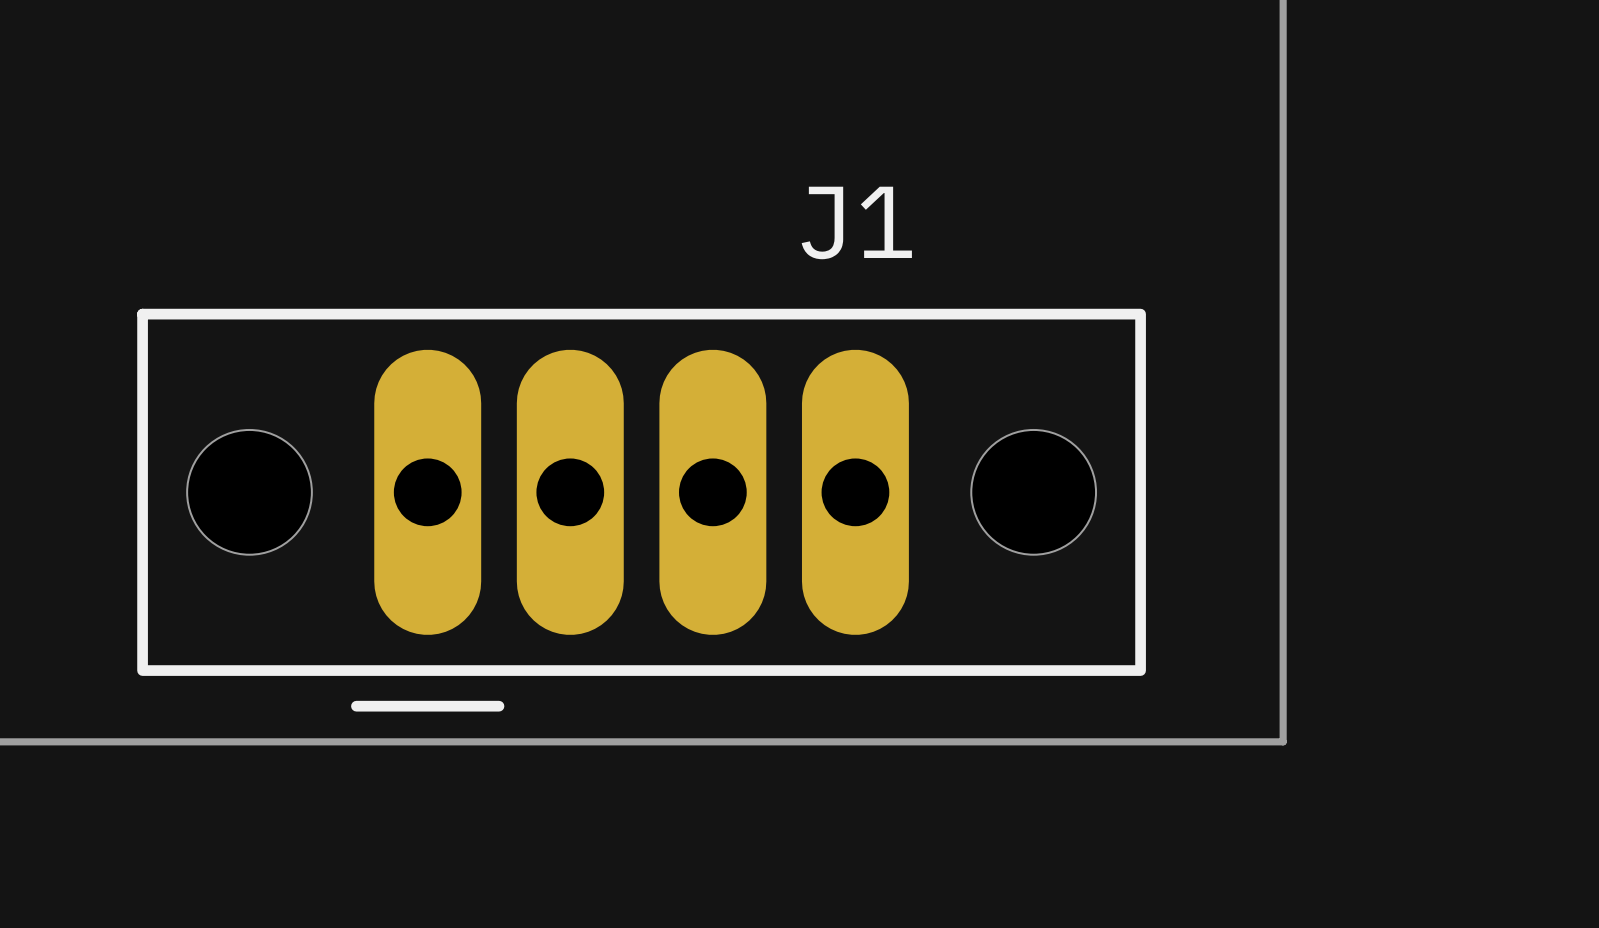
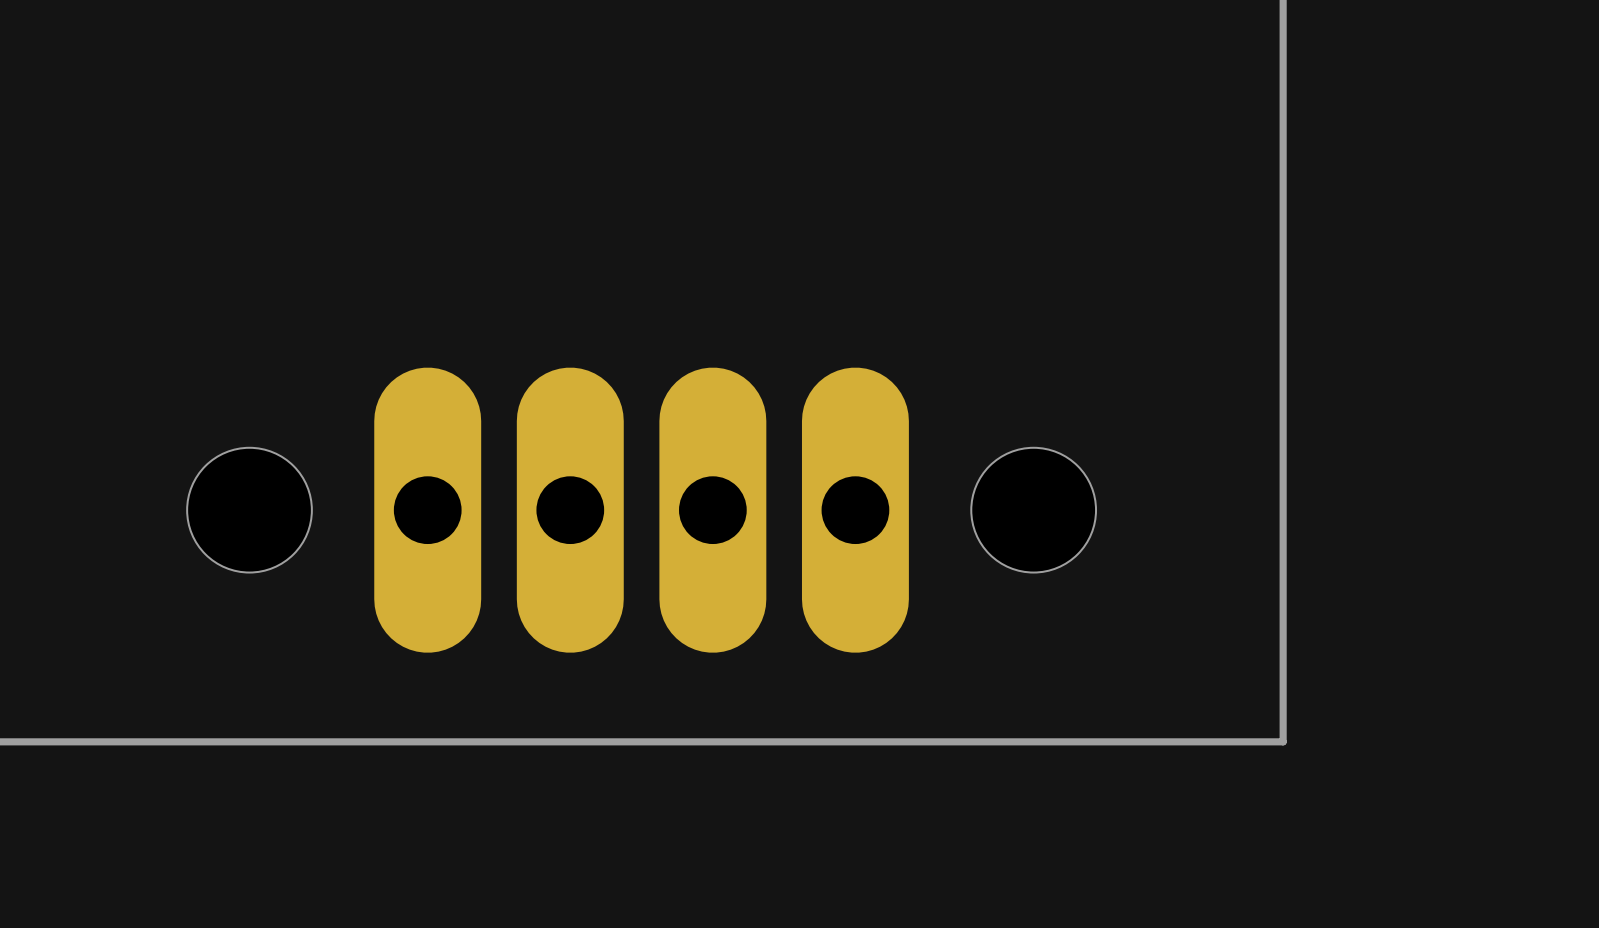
J1 side: bottom (641, 510) -> top (641, 510)

